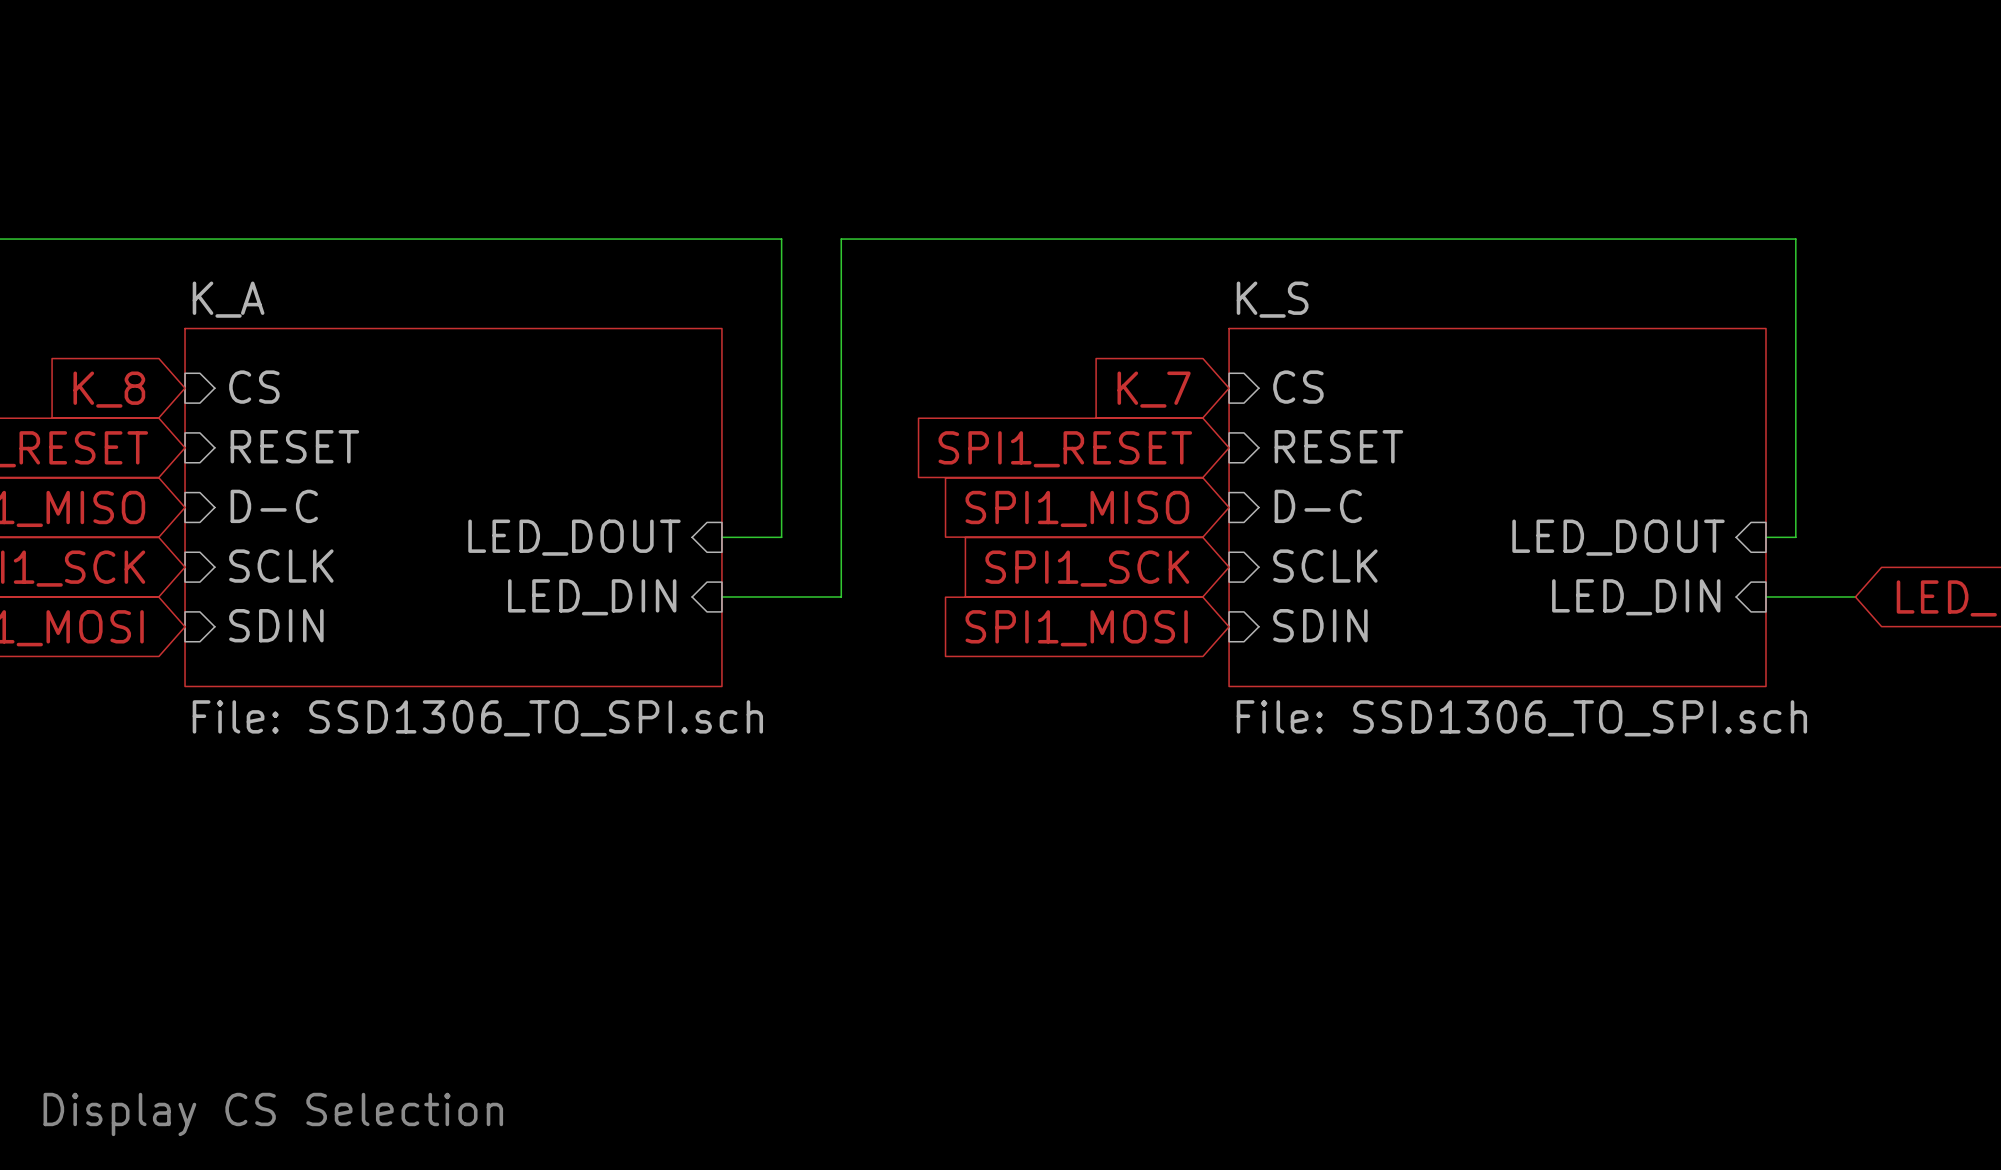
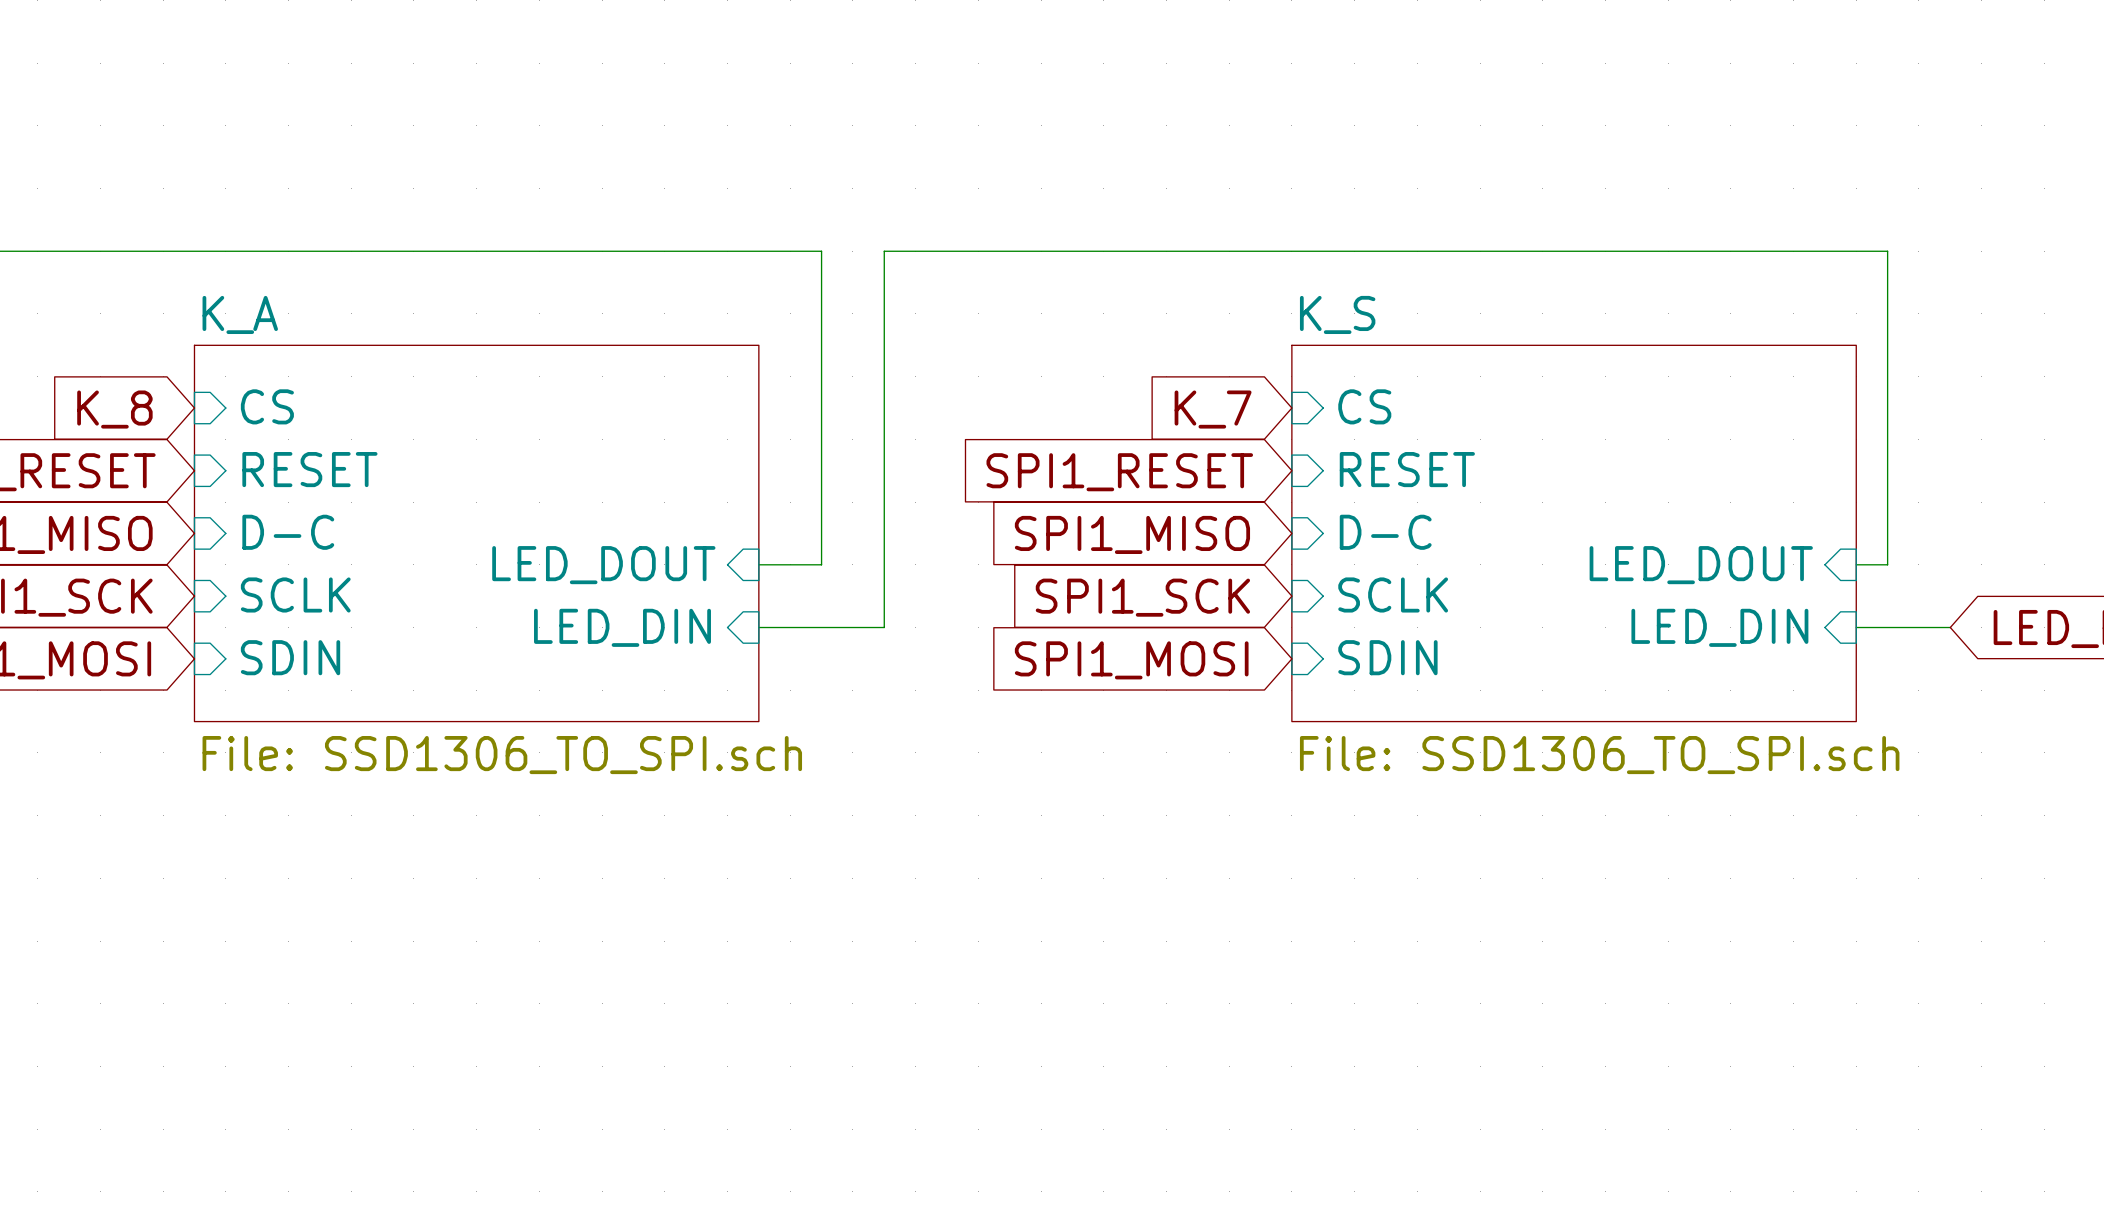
text: Display CS Selection (273, 1114) -> none

